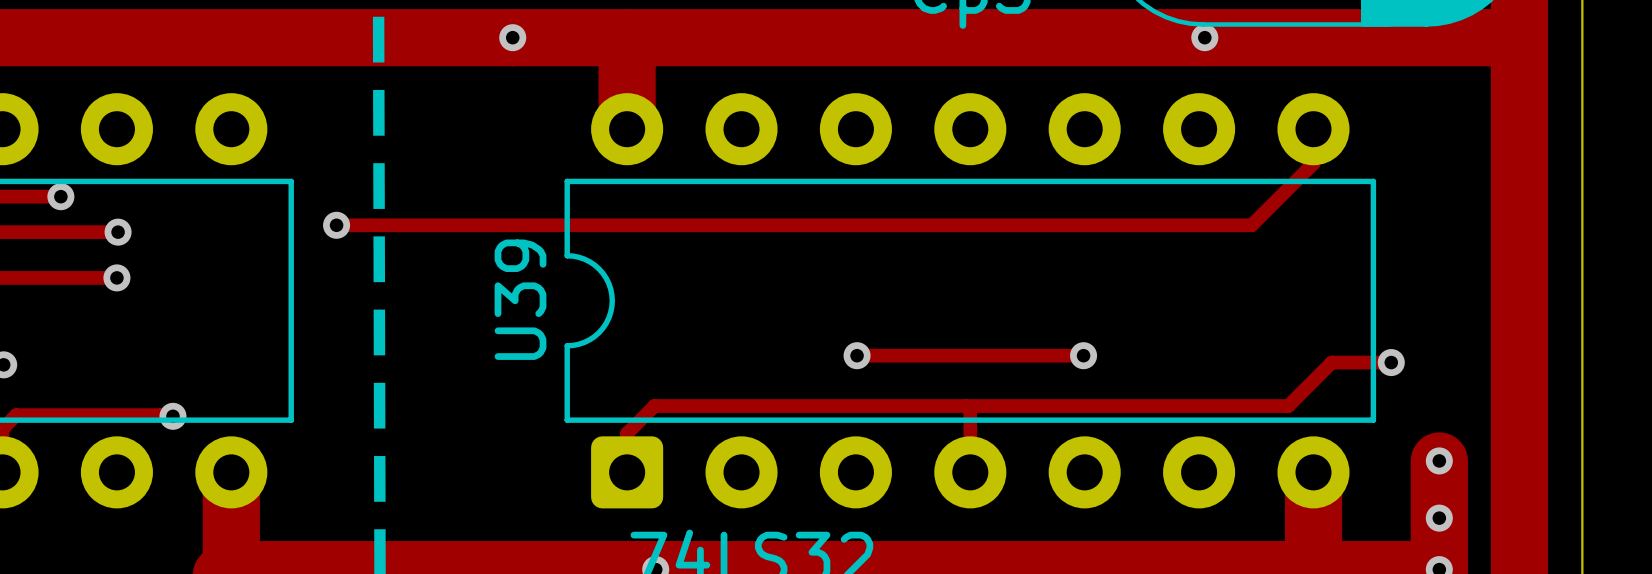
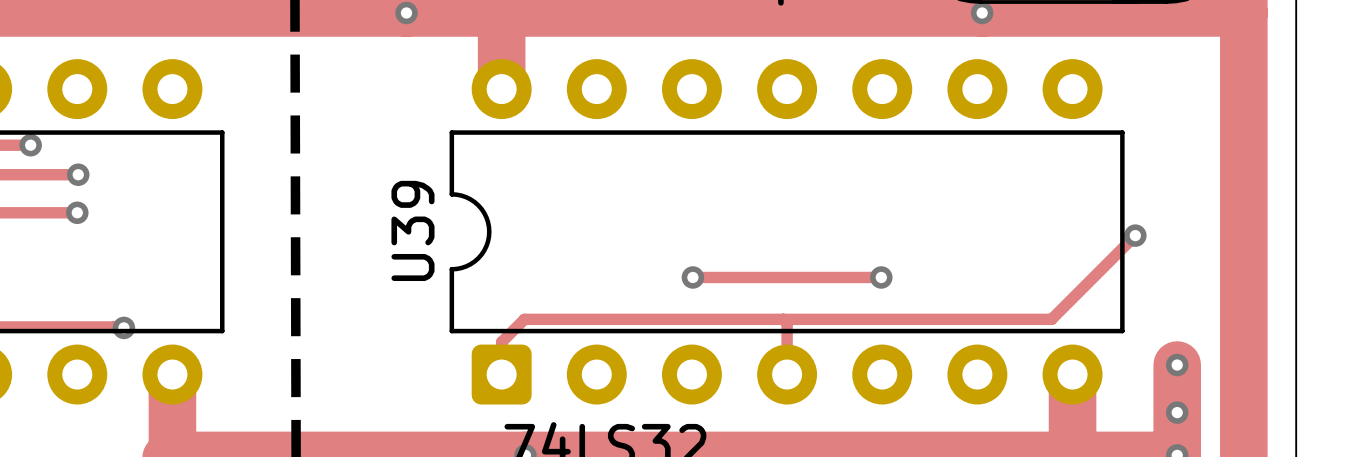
track: (1313, 129) (1313, 163) (1251, 225) (336, 225) -> none
via: (336, 225) -> none
track: (1331, 362) (1391, 362) -> (1087, 283) (1135, 235)
via position: (1391, 362) -> (1135, 235)

